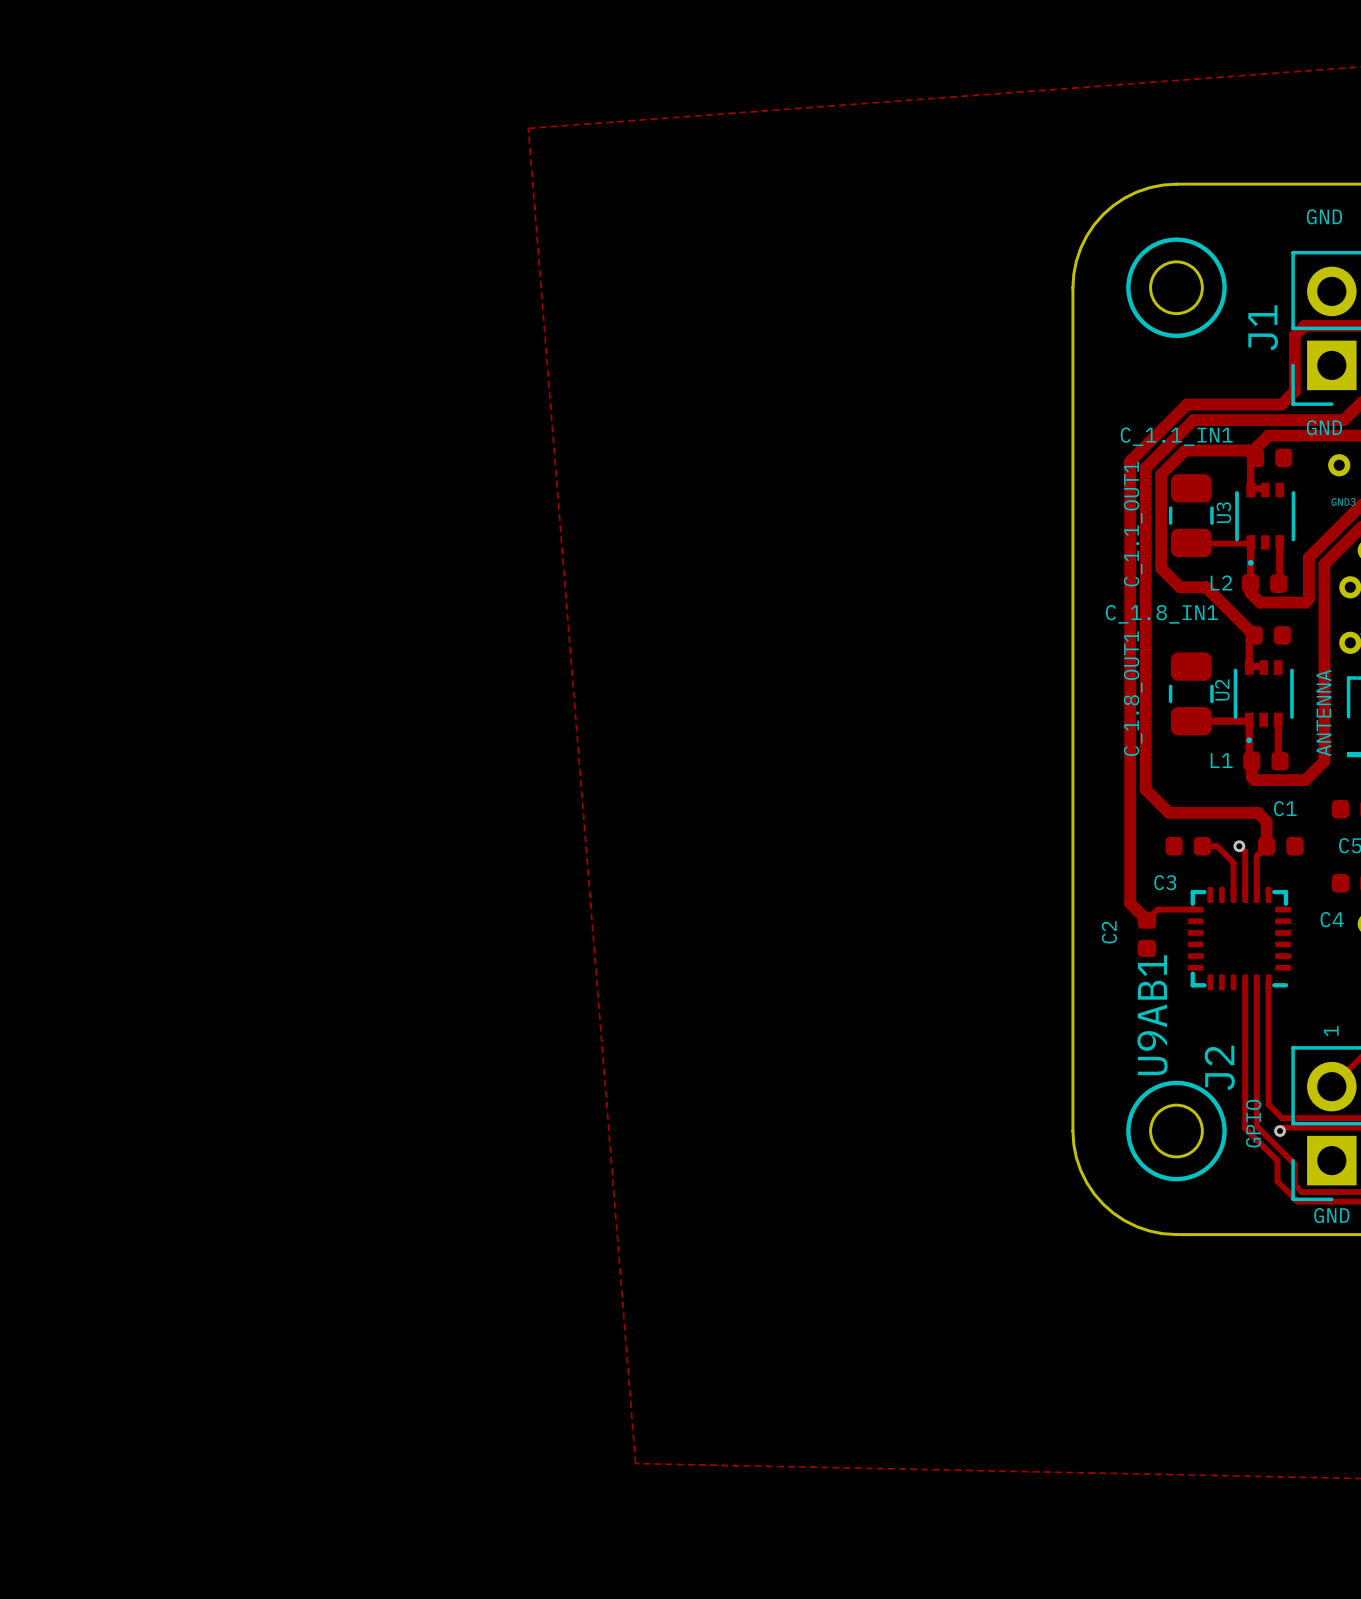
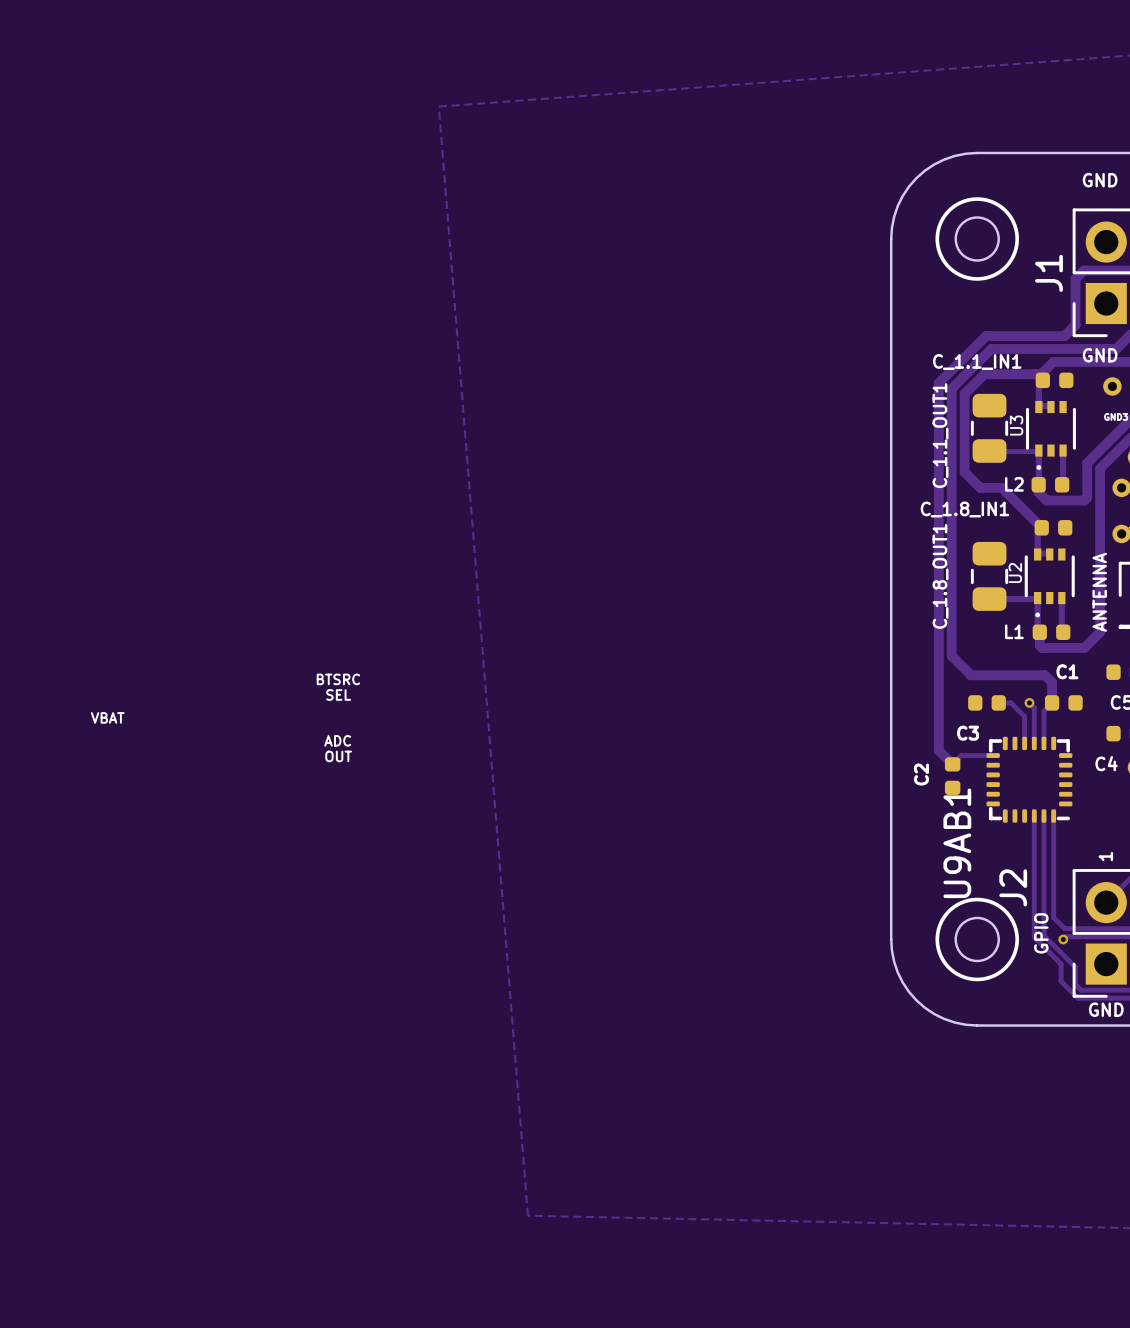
text: none -> BTSRC (338, 679)
text: none -> SEL (338, 694)
text: none -> VBAT (107, 717)
text: none -> ADC (337, 740)
text: none -> OUT (338, 756)

